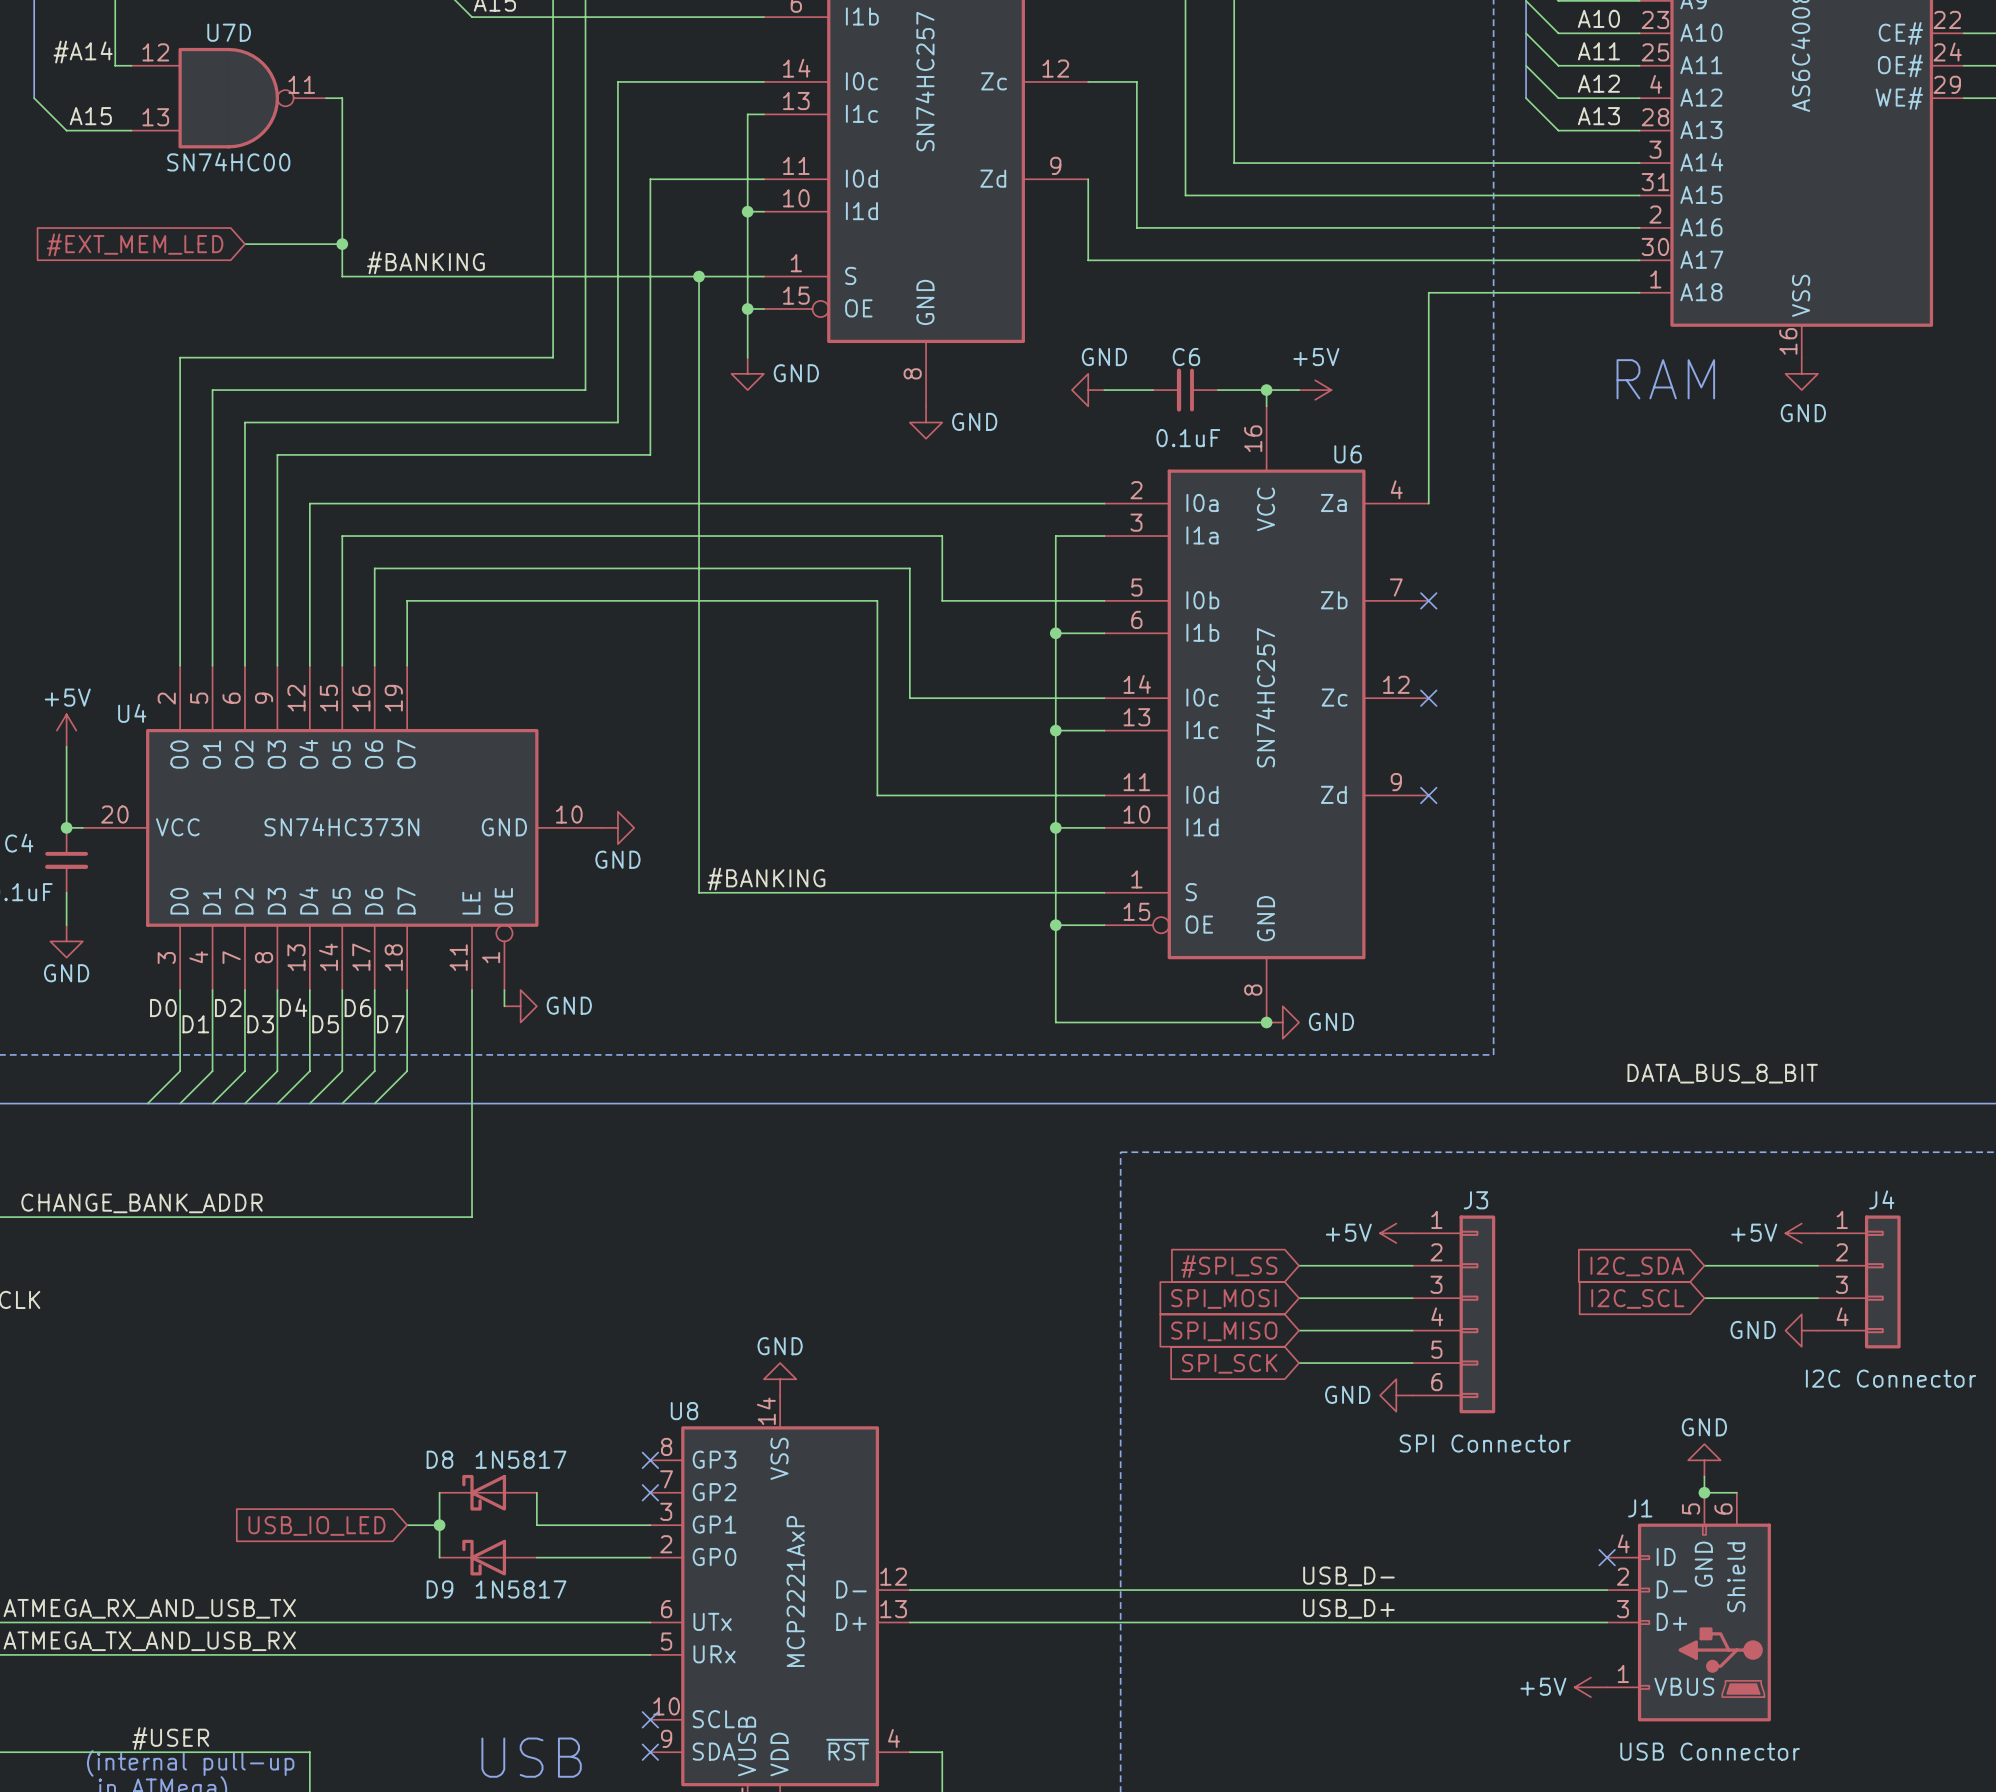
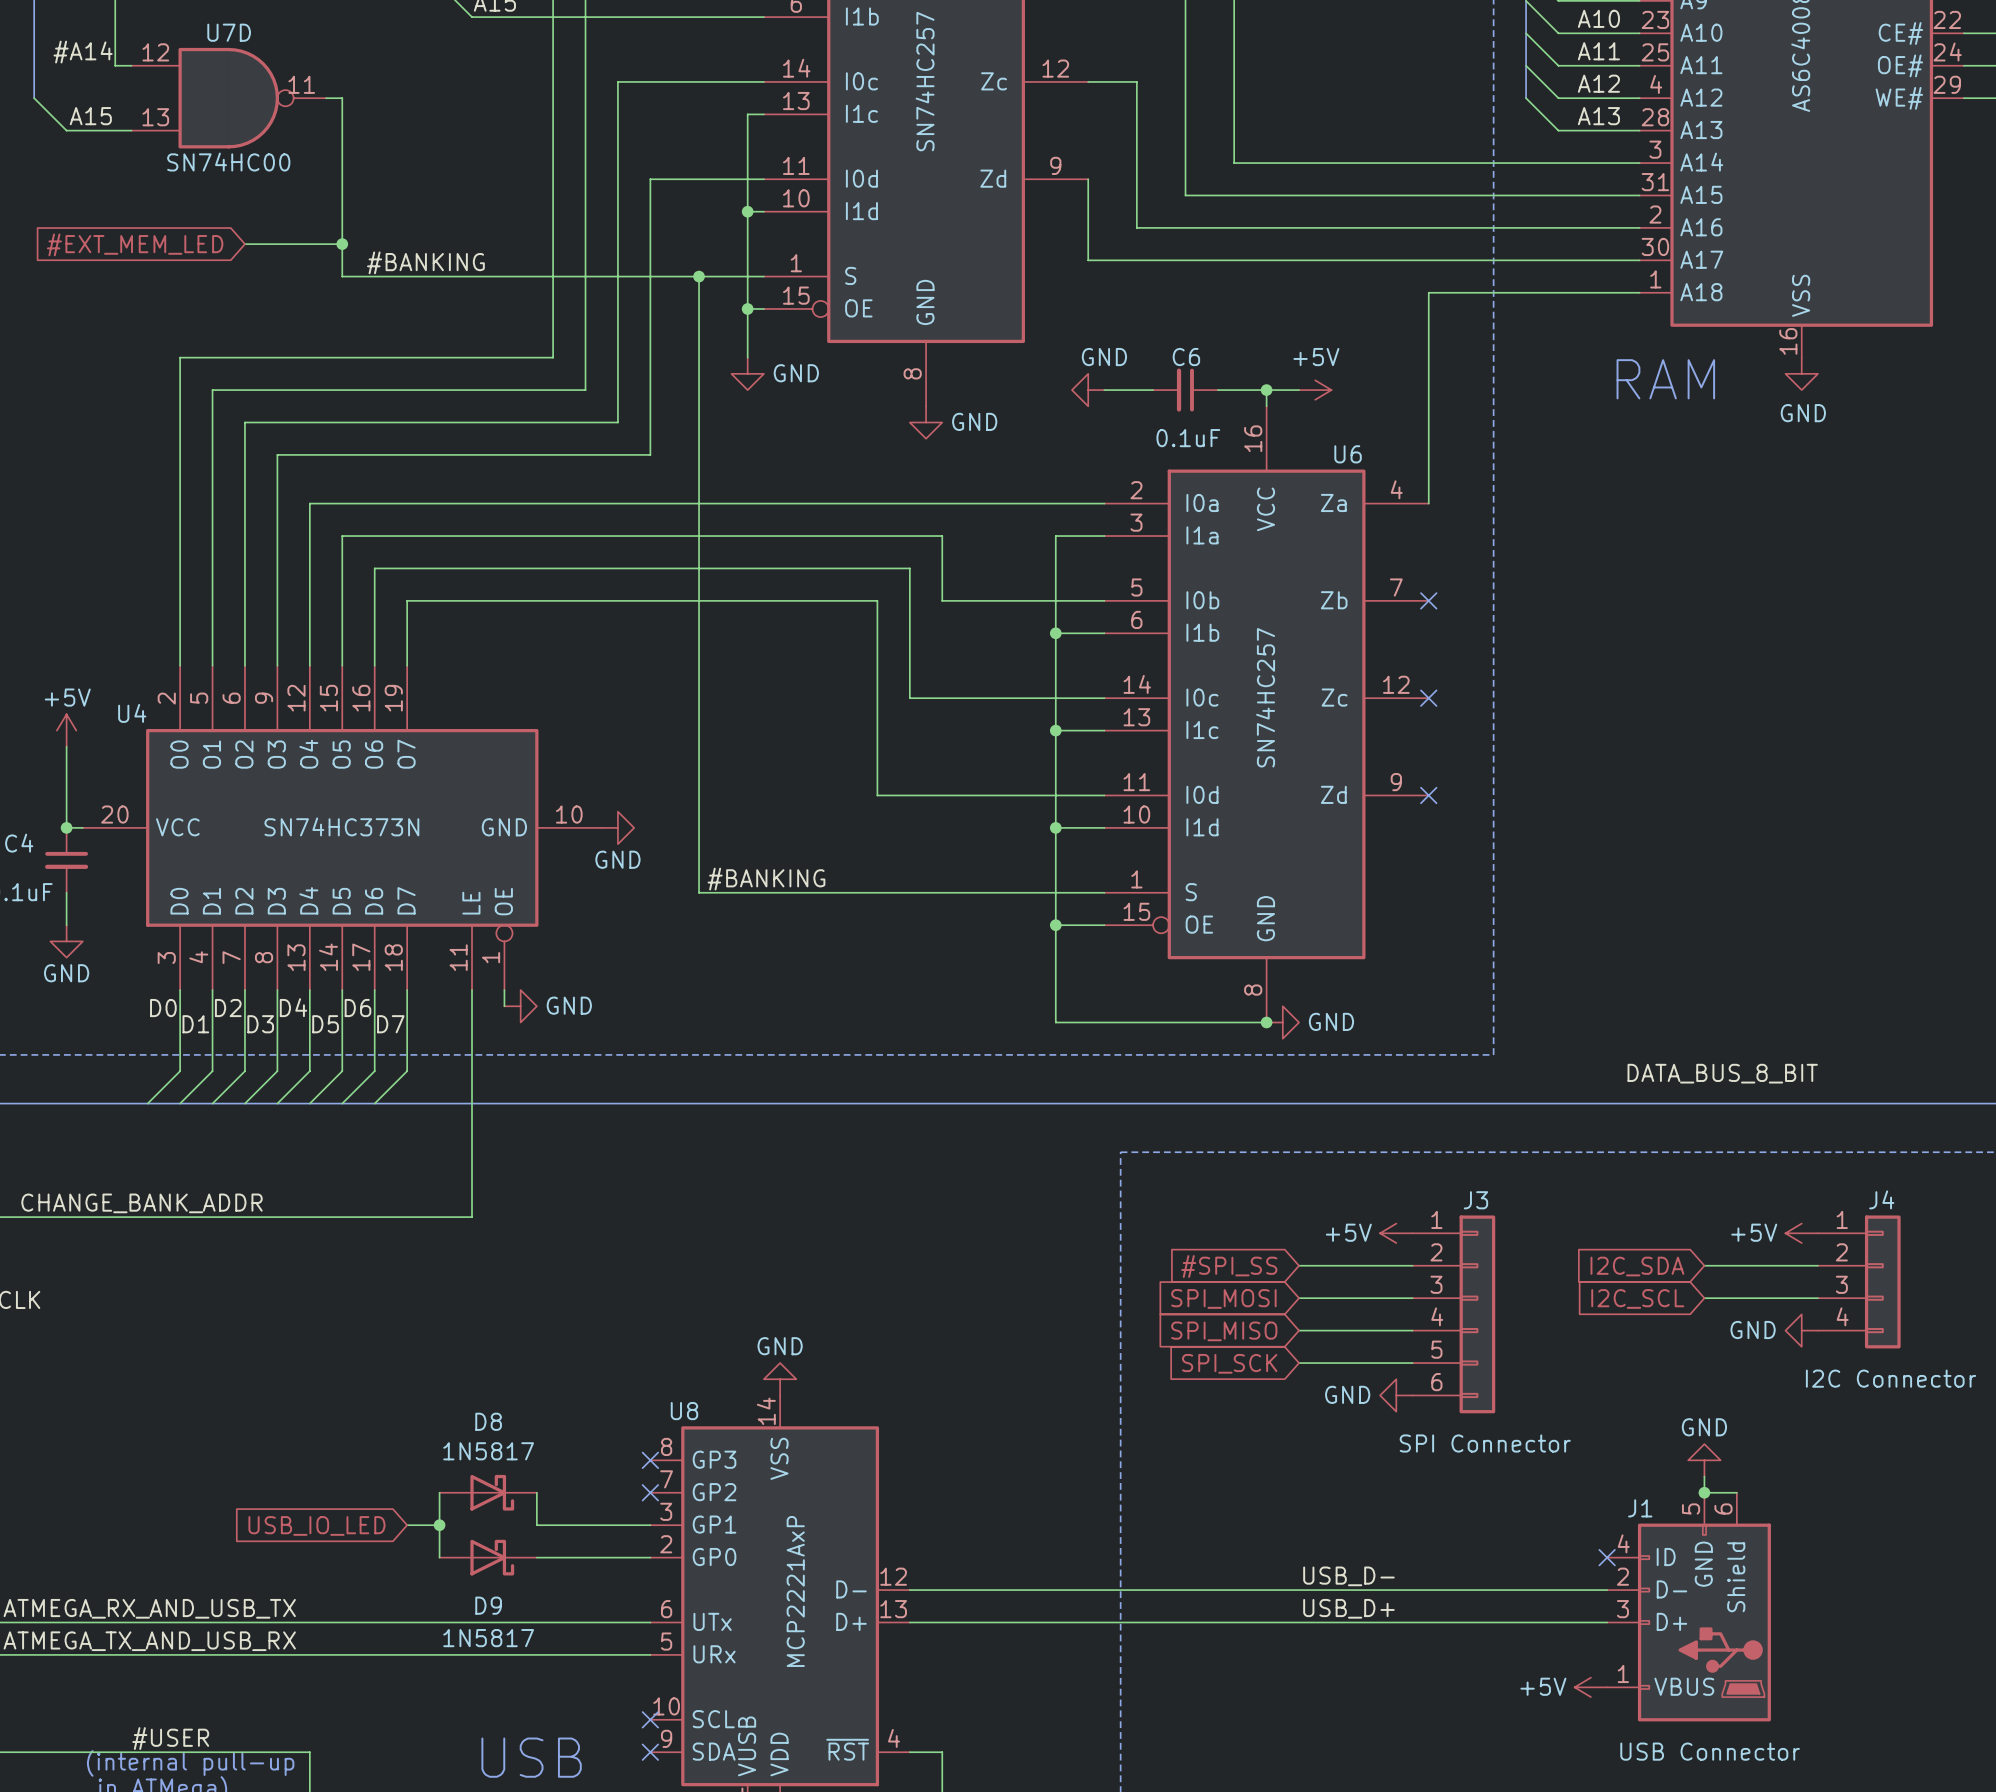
D8 name position: D8 (439, 1459) -> D8 (488, 1421)
D8 value position: 1N5817 (521, 1459) -> 1N5817 (488, 1451)
D8 rotation: 0° (484, 1492) -> 180° (492, 1492)
D9 rotation: 0° (484, 1557) -> 180° (492, 1557)
D9 name position: D9 (439, 1589) -> D9 (488, 1605)
D9 value position: 1N5817 (521, 1589) -> 1N5817 (488, 1638)

